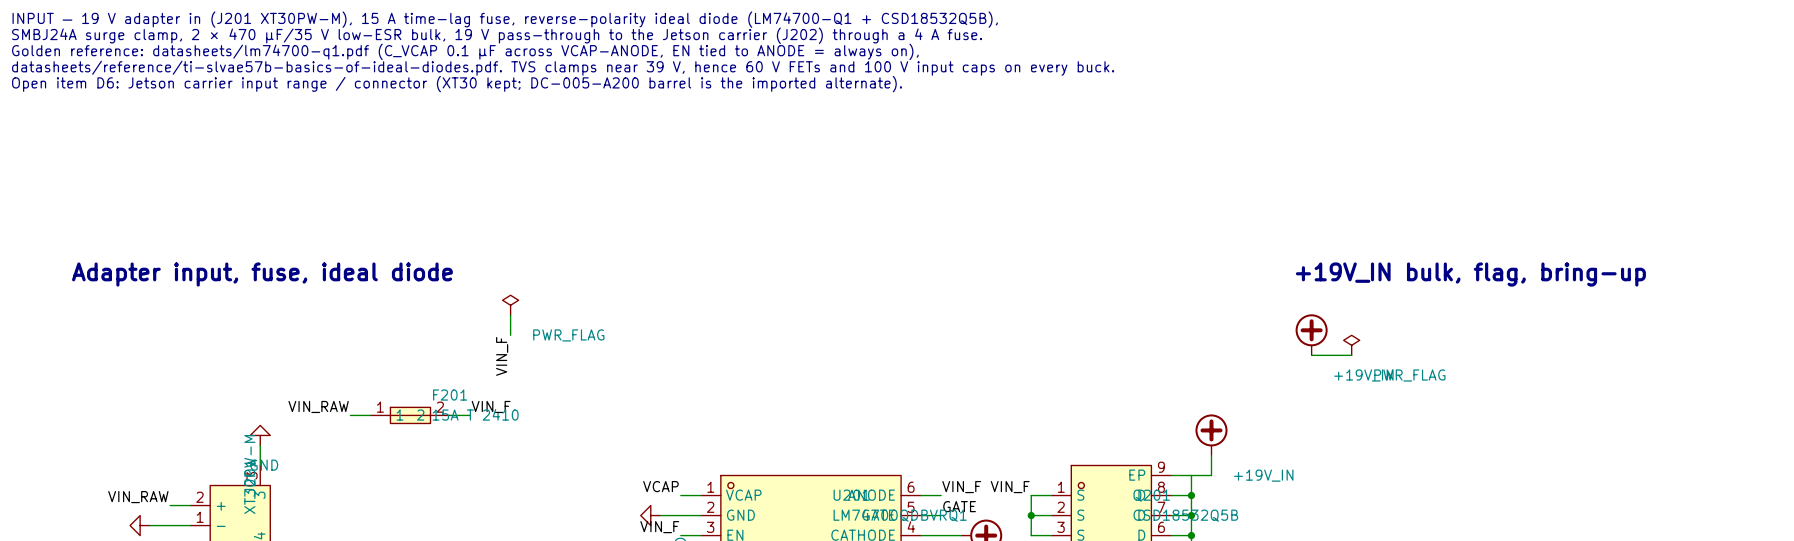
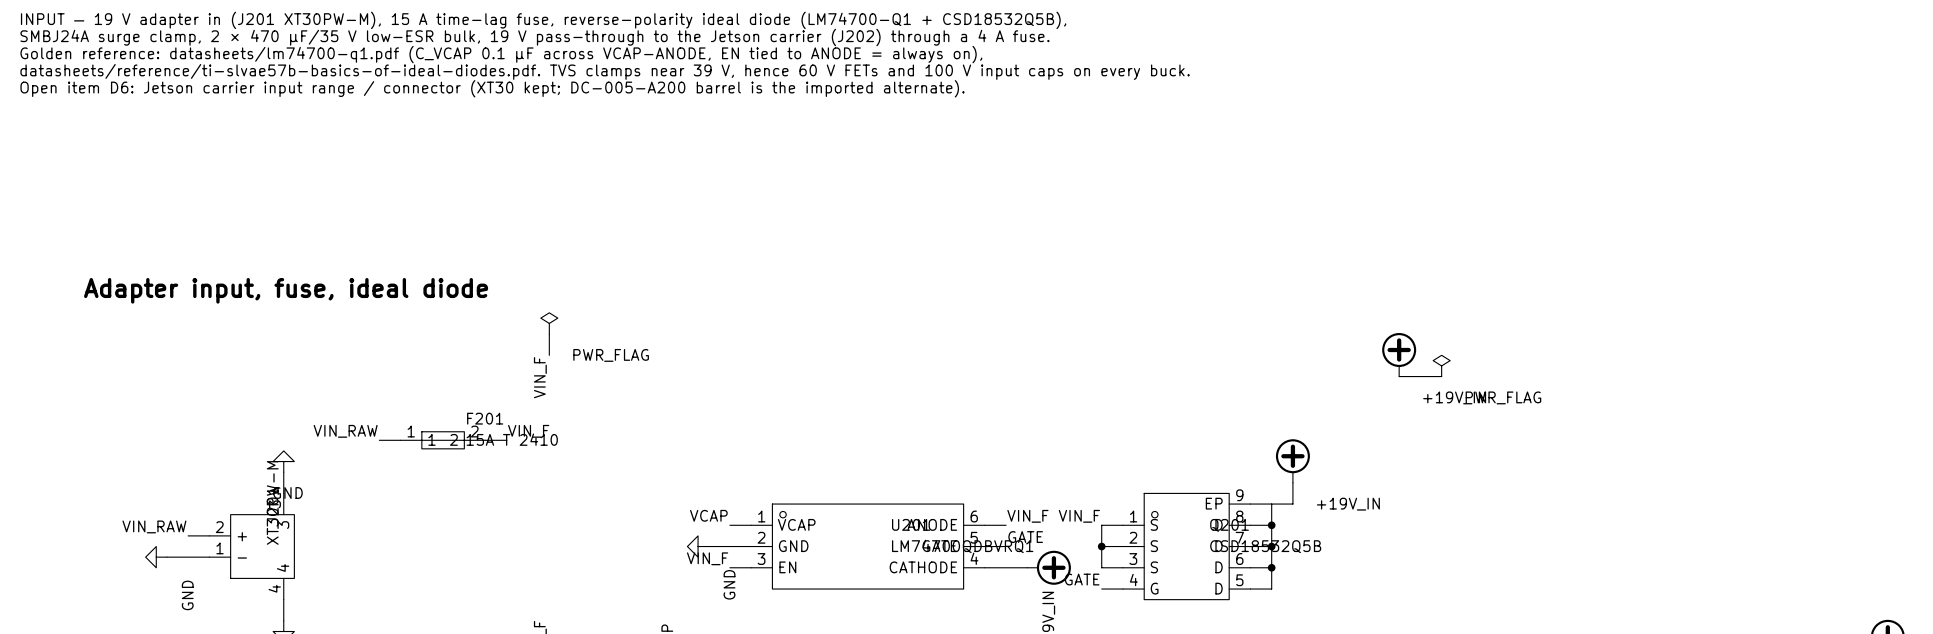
text: +19V_IN bulk, flag, bring-up (1470, 274) -> none

